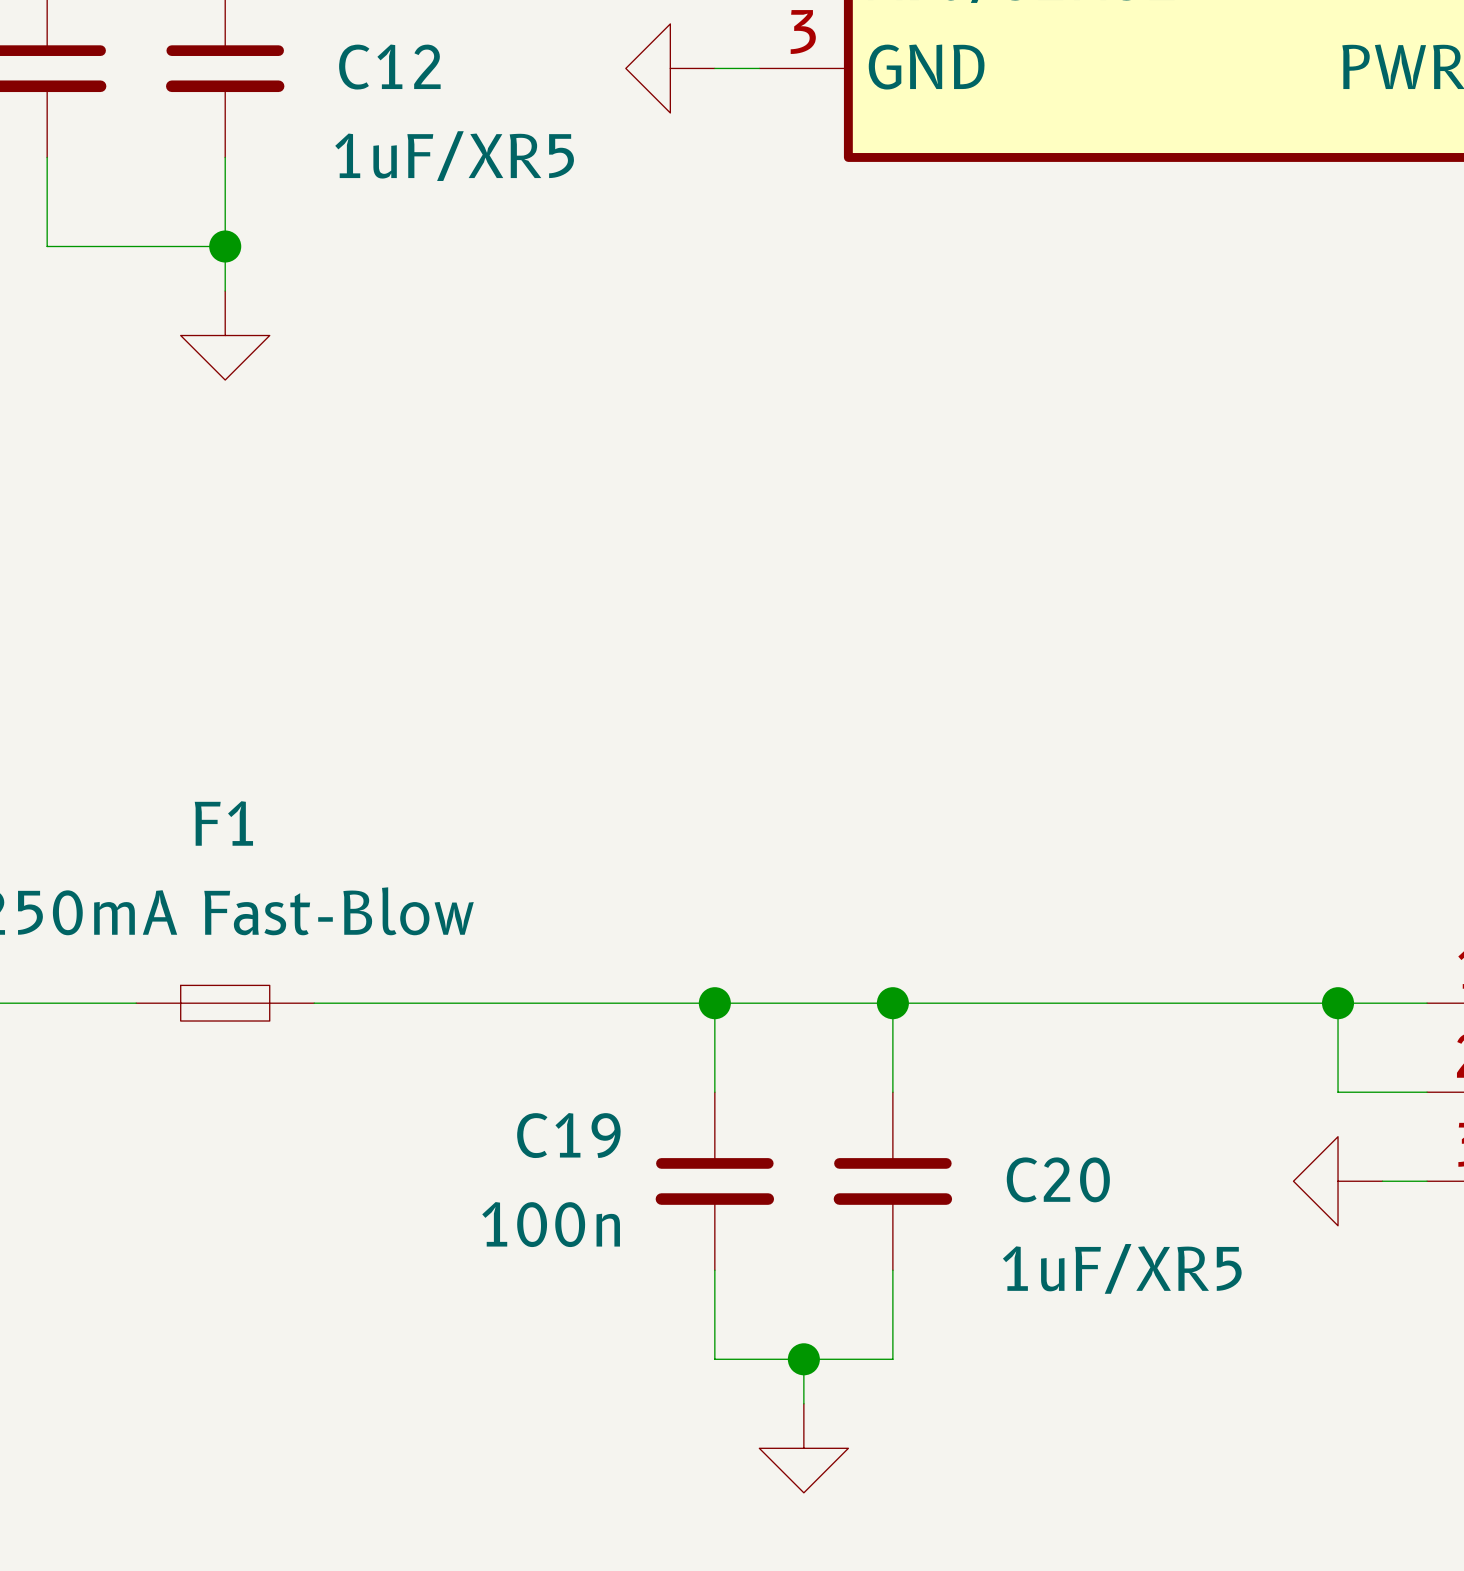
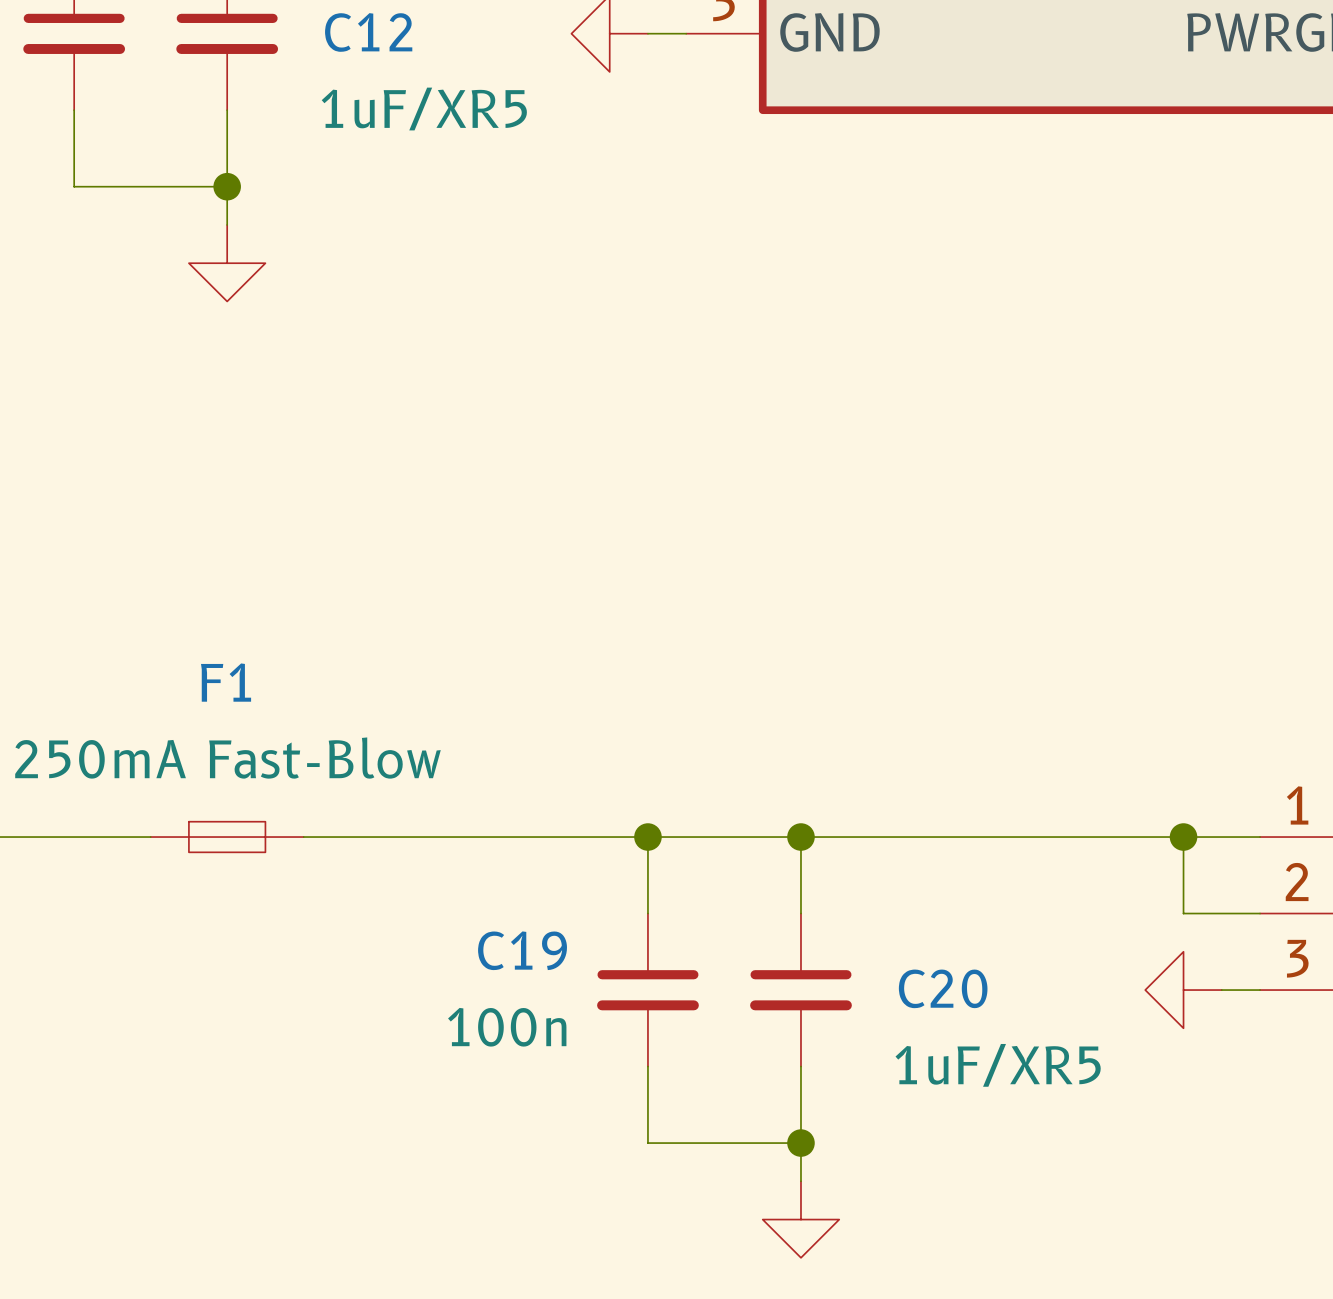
wire: (803, 1359) (803, 1403) -> (800, 1143) (800, 1181)
junction position: (803, 1359) -> (800, 1143)
power symbol position: (803, 1448) -> (800, 1219)

